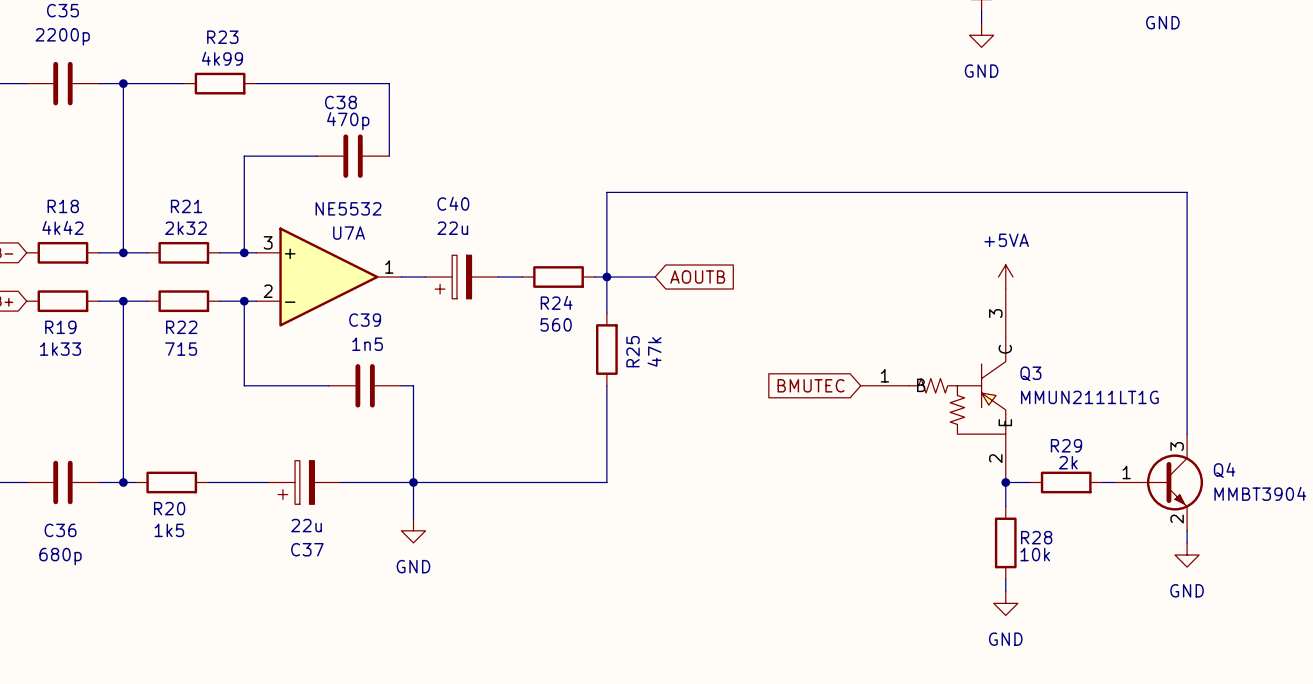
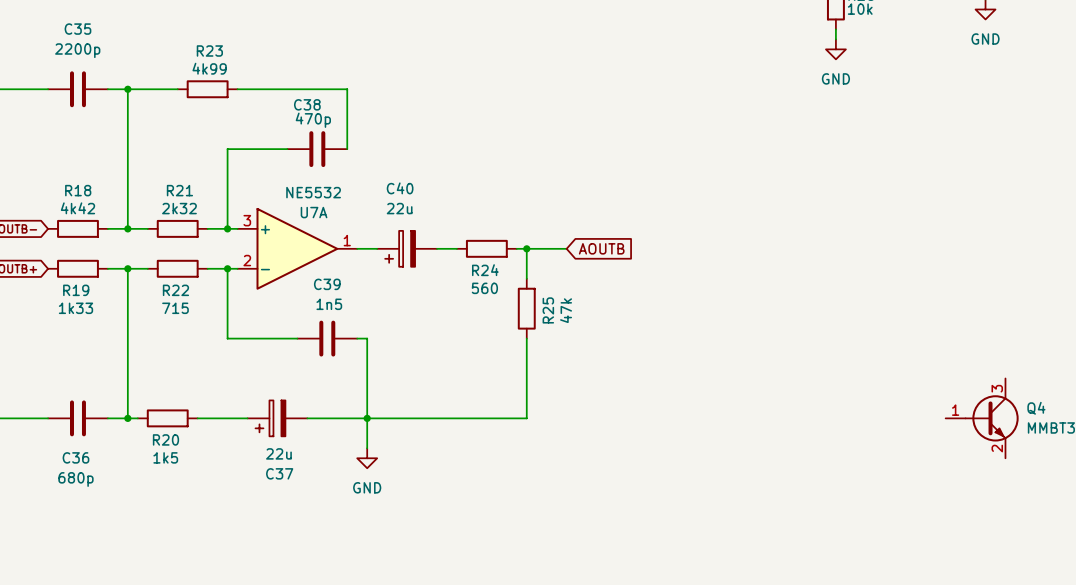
wire: (606, 277) (606, 192) (1187, 192) (1187, 434) -> none
power symbol: +5VA (1005, 277) -> none
global label: BMUTEC (811, 385) -> none
Q3: MMUN2111LT1G (933, 385) -> none
junction: (1005, 482) -> none
wire: (1029, 482) (1005, 482) (1005, 506) -> none
R29: 2k (1066, 482) -> none
wire: (1102, 482) (1114, 482) -> none
wire: (1187, 530) (1187, 542) -> none
R28: 10k (1005, 542) -> none
power symbol: GND (1187, 555) -> none
wire: (1005, 579) (1005, 591) -> none
power symbol: GND (1005, 603) -> none

